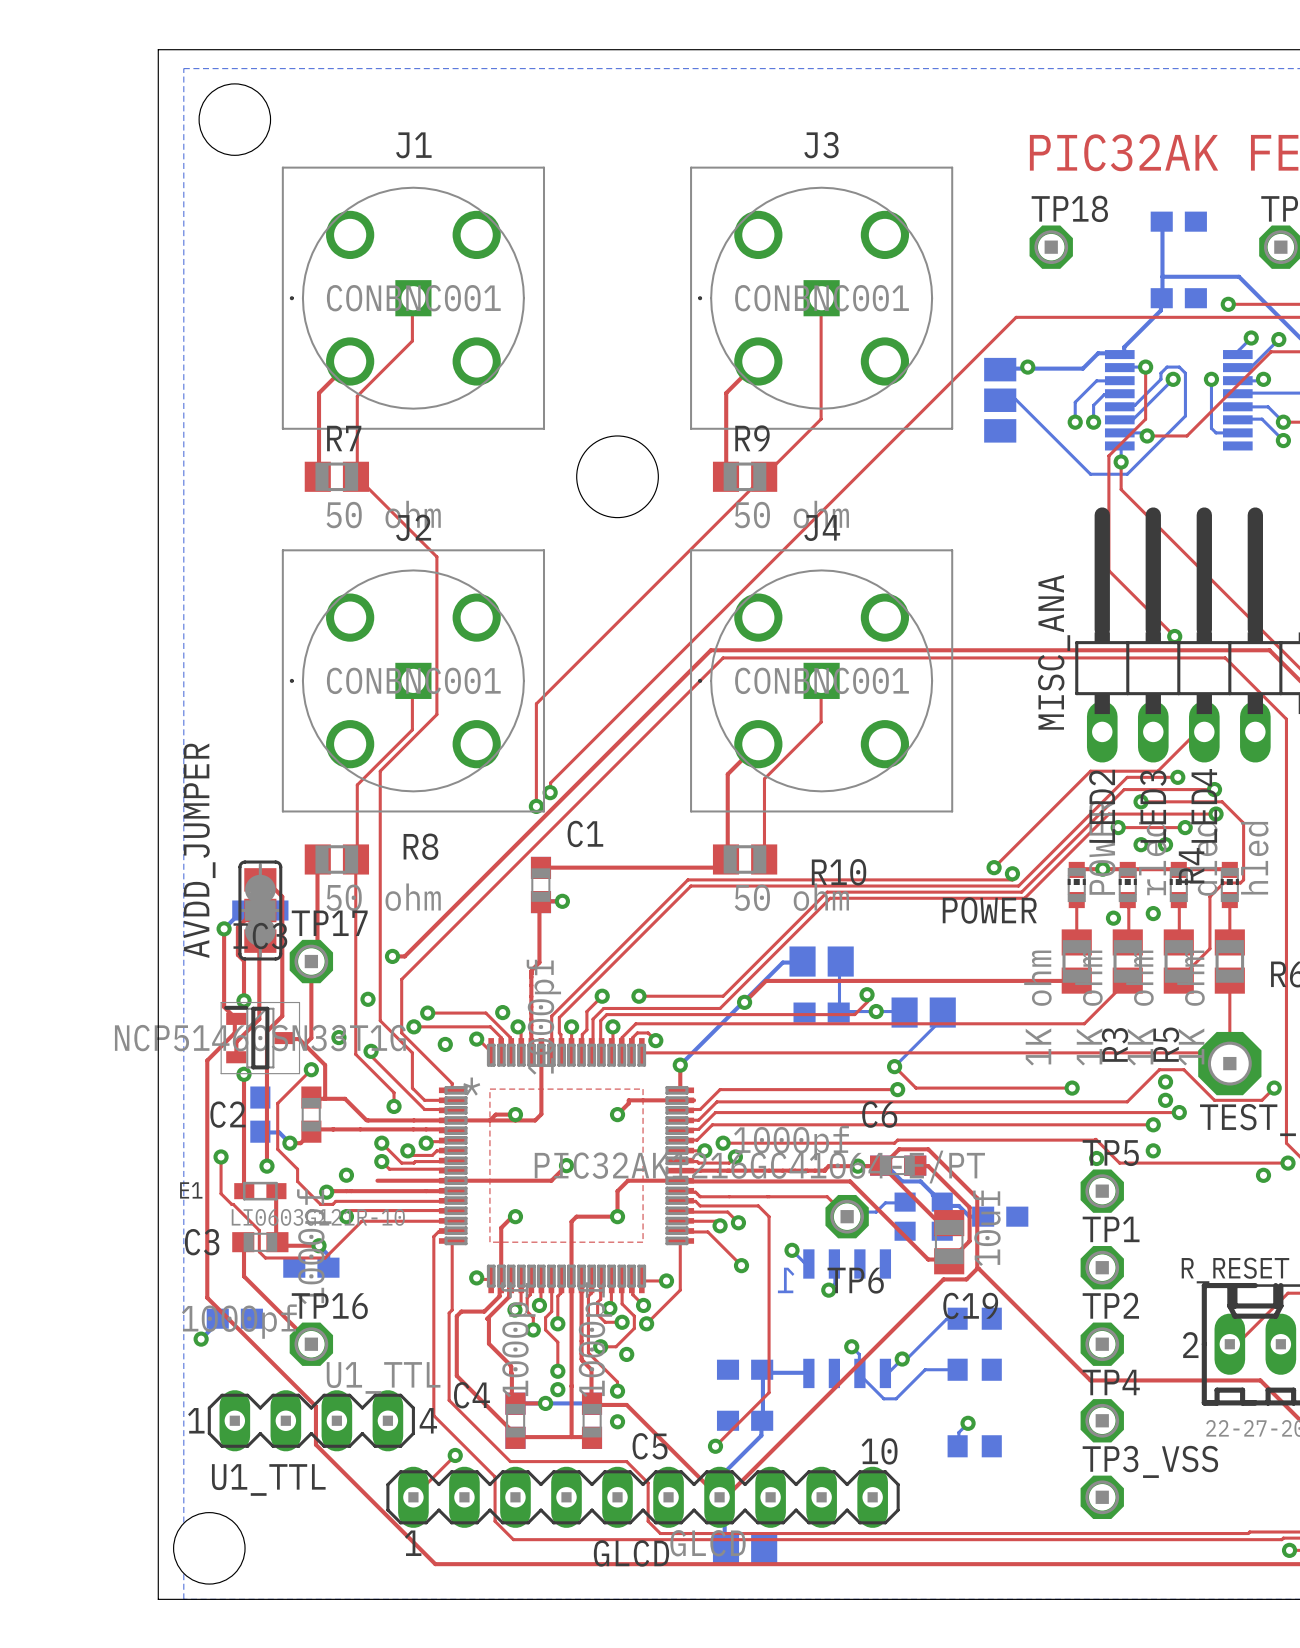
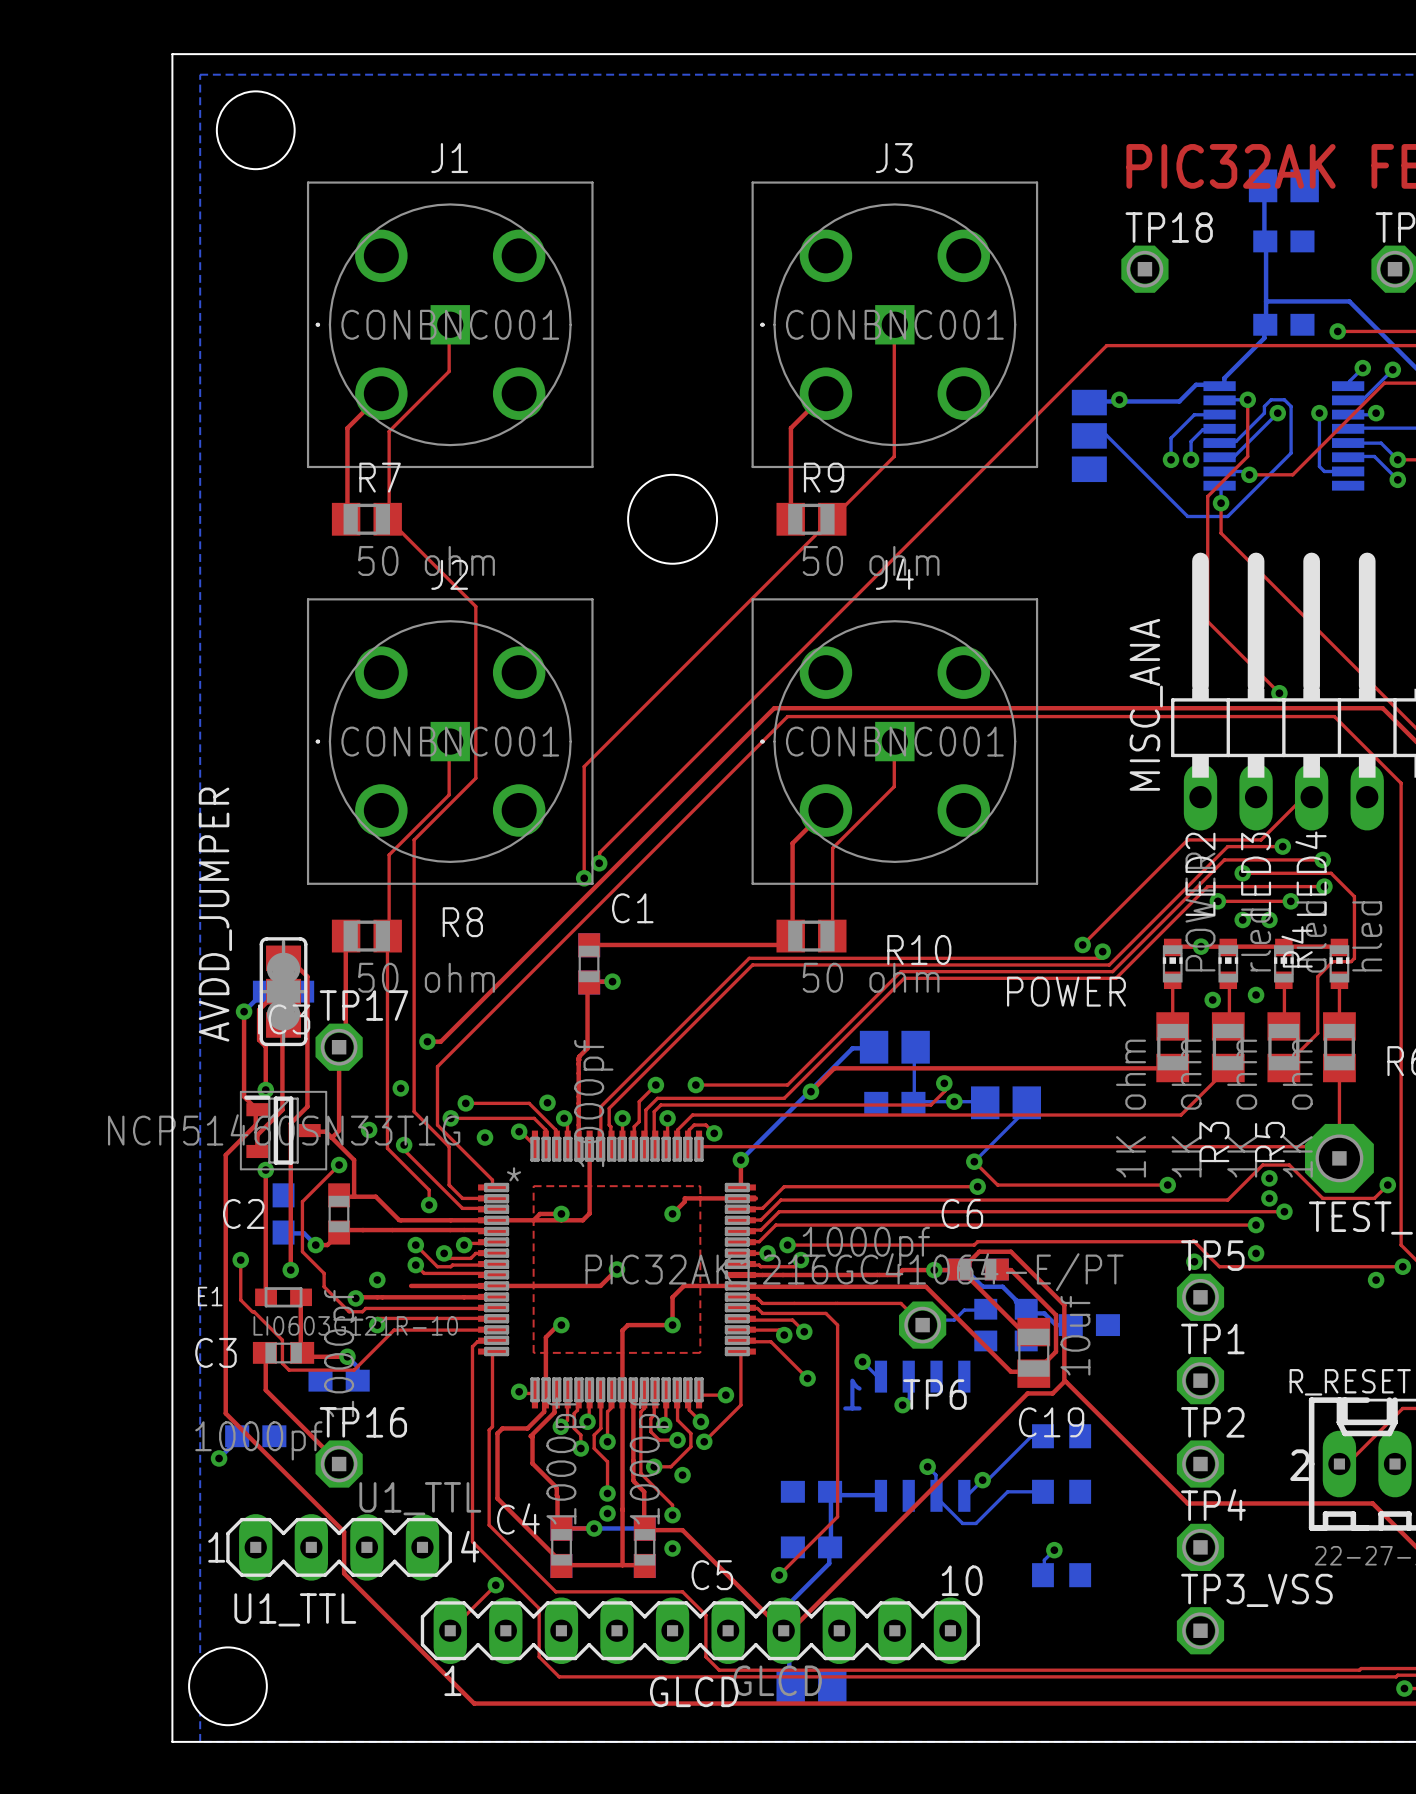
bottom track: none -> (1263, 185) (1265, 241)
part: none -> (1283, 185)

